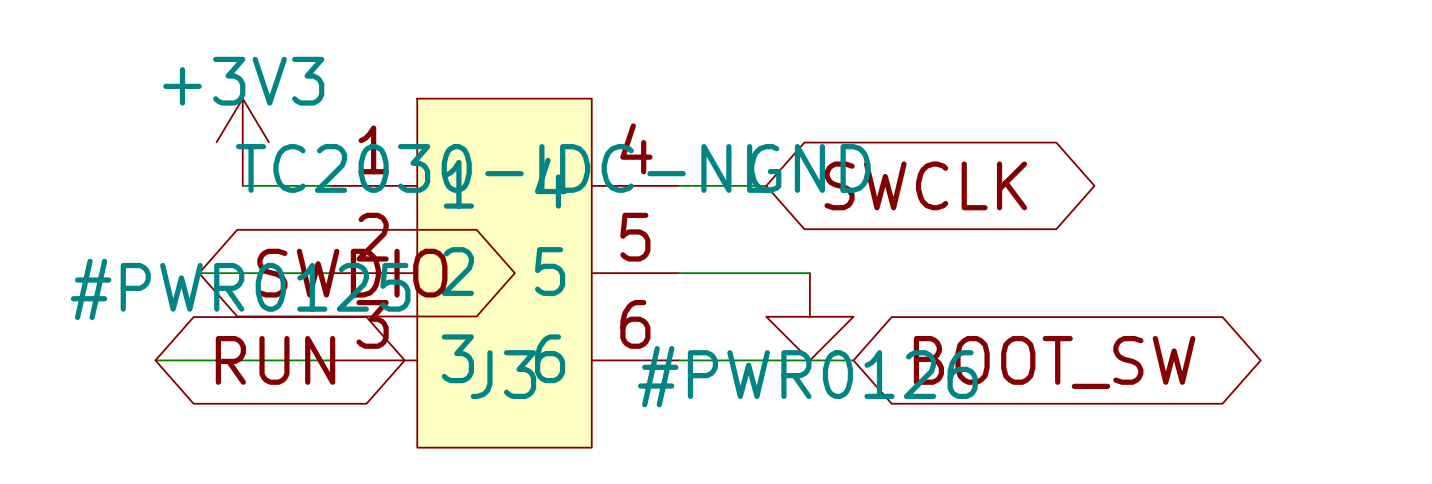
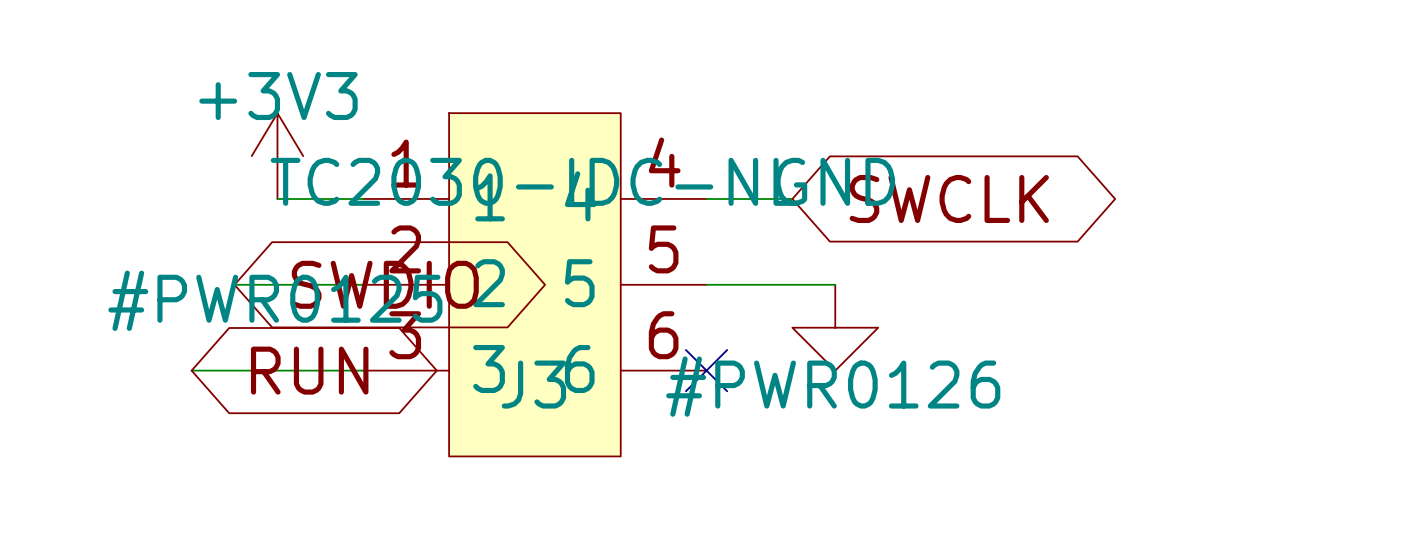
wire: (679, 360) (853, 360) -> none
no-connect mark: none -> (706, 370)
global label: BOOT_SW (1054, 362) -> none

